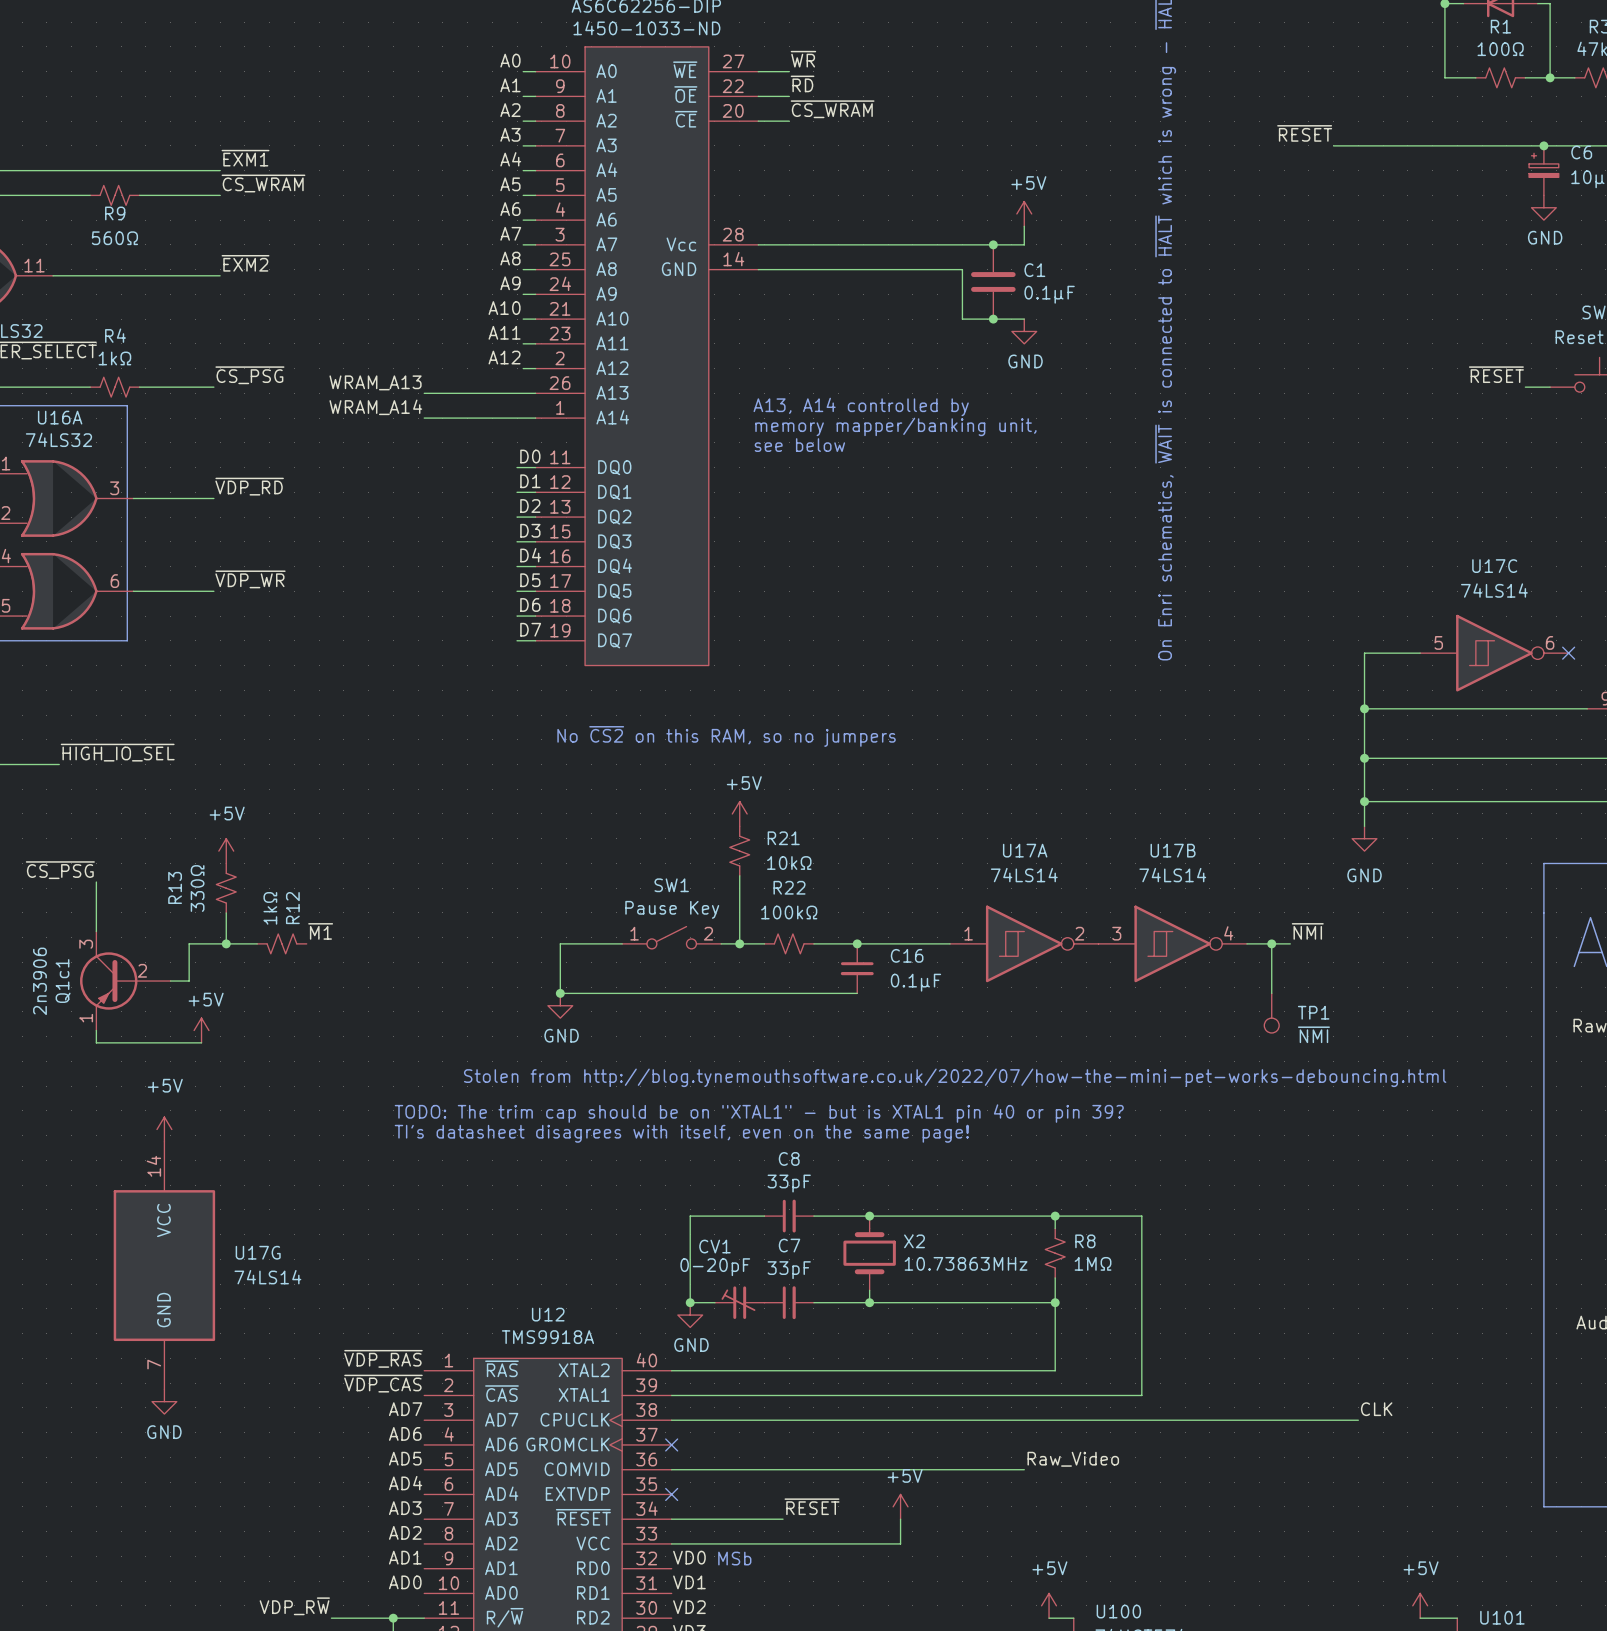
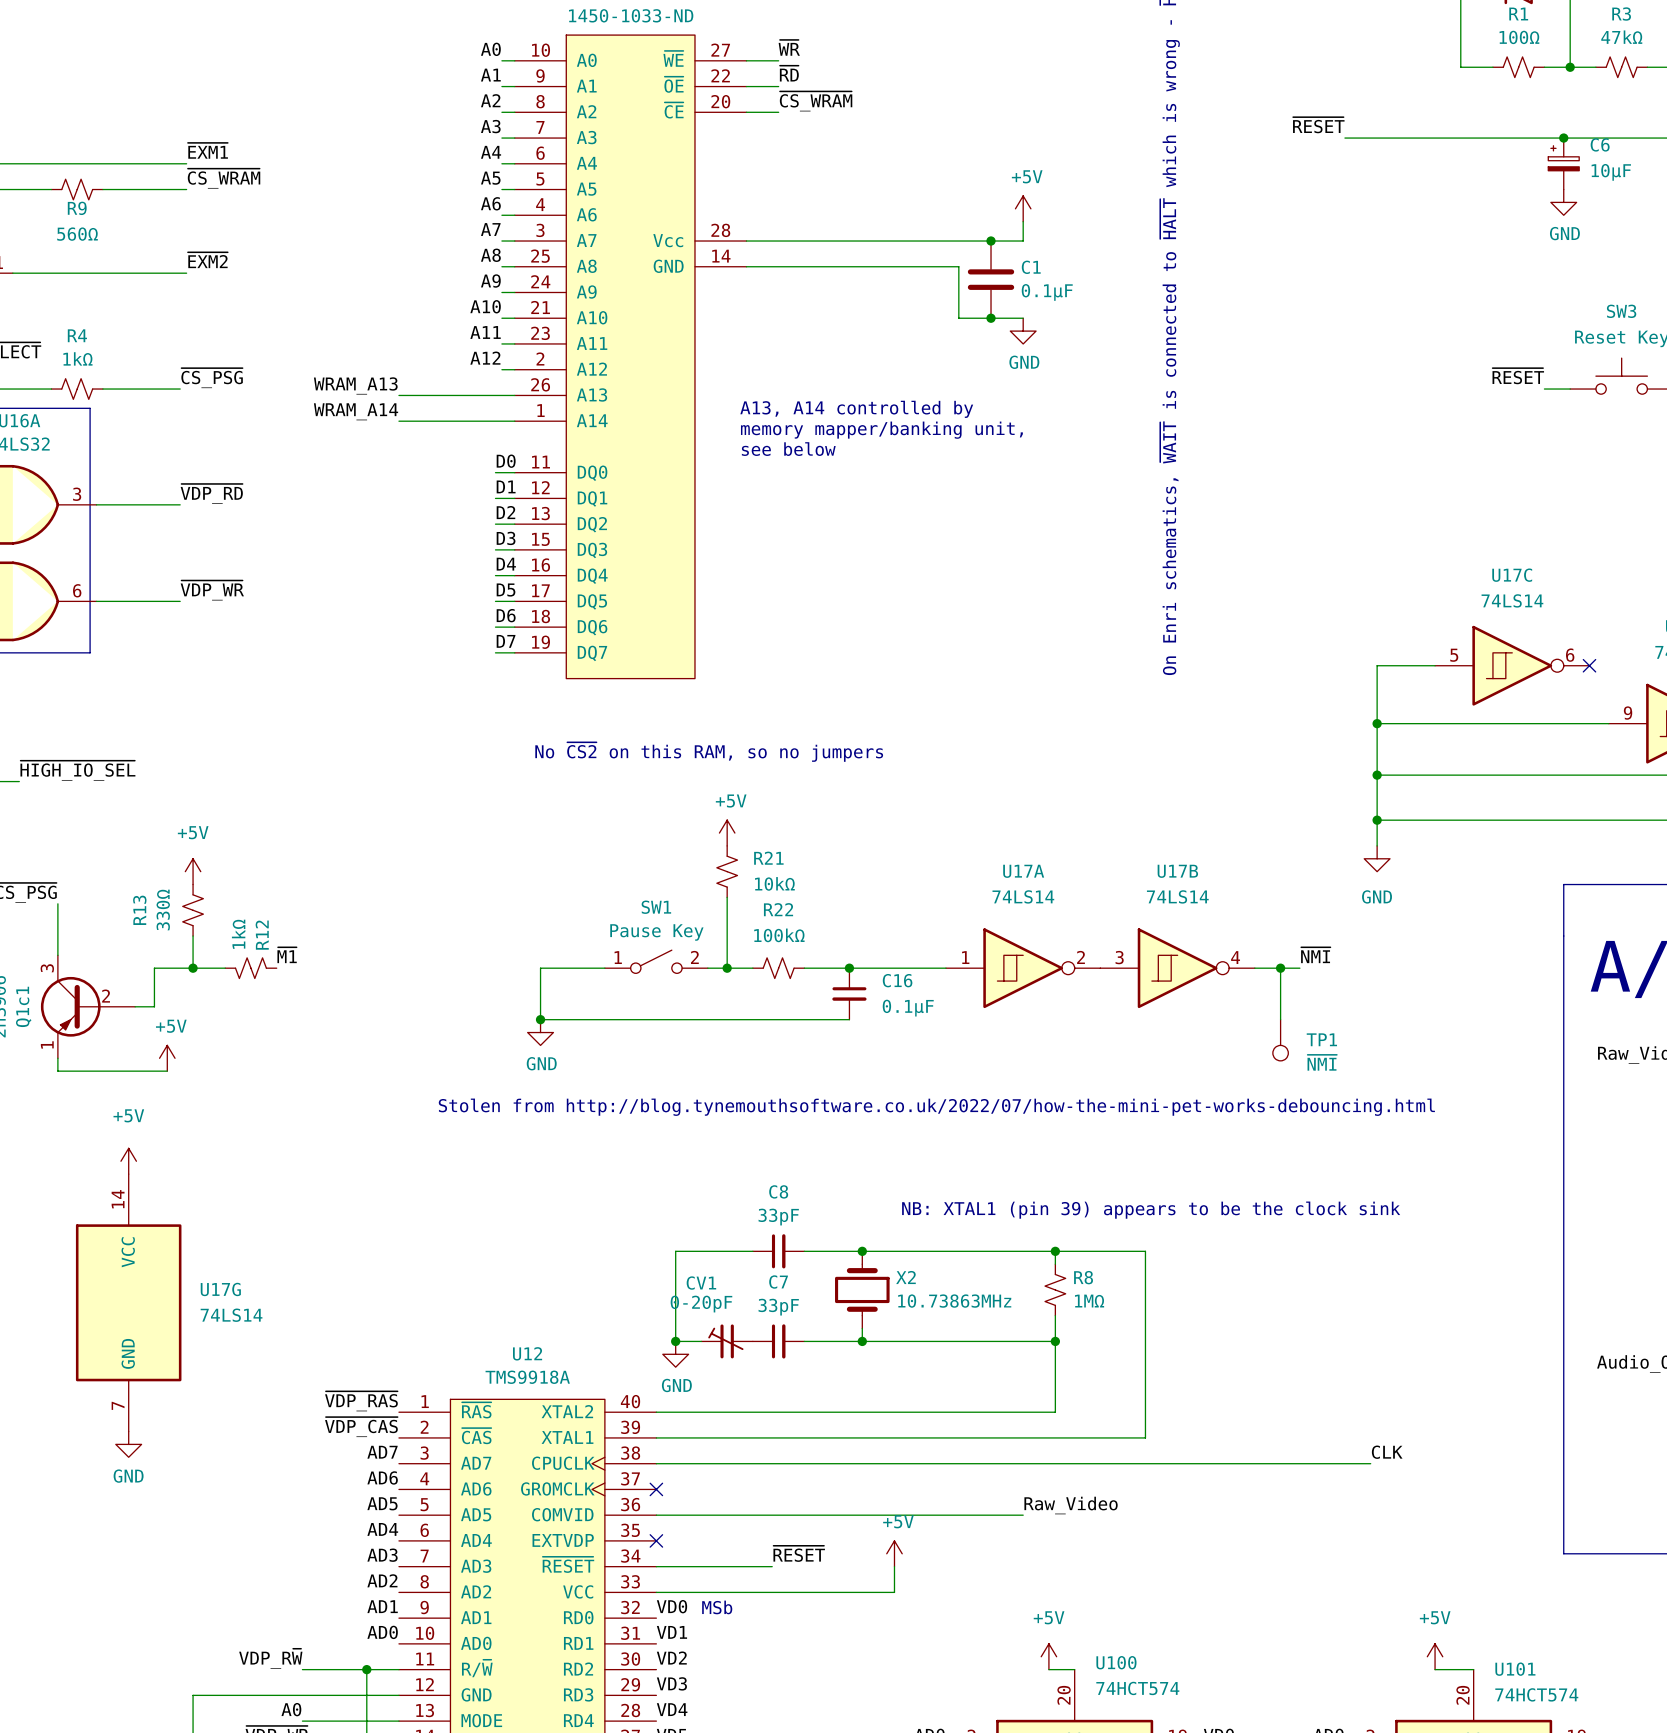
text: TODO: The trim cap should be on "XTAL1" - but is XTAL1 pin 40 or pin 39? (759, 1113) -> none
text: TI's datasheet disagrees with itself, even on the same page! (681, 1133) -> none
text: none -> NB: XTAL1 (pin 39) appears to be the clock sink (1151, 1210)

